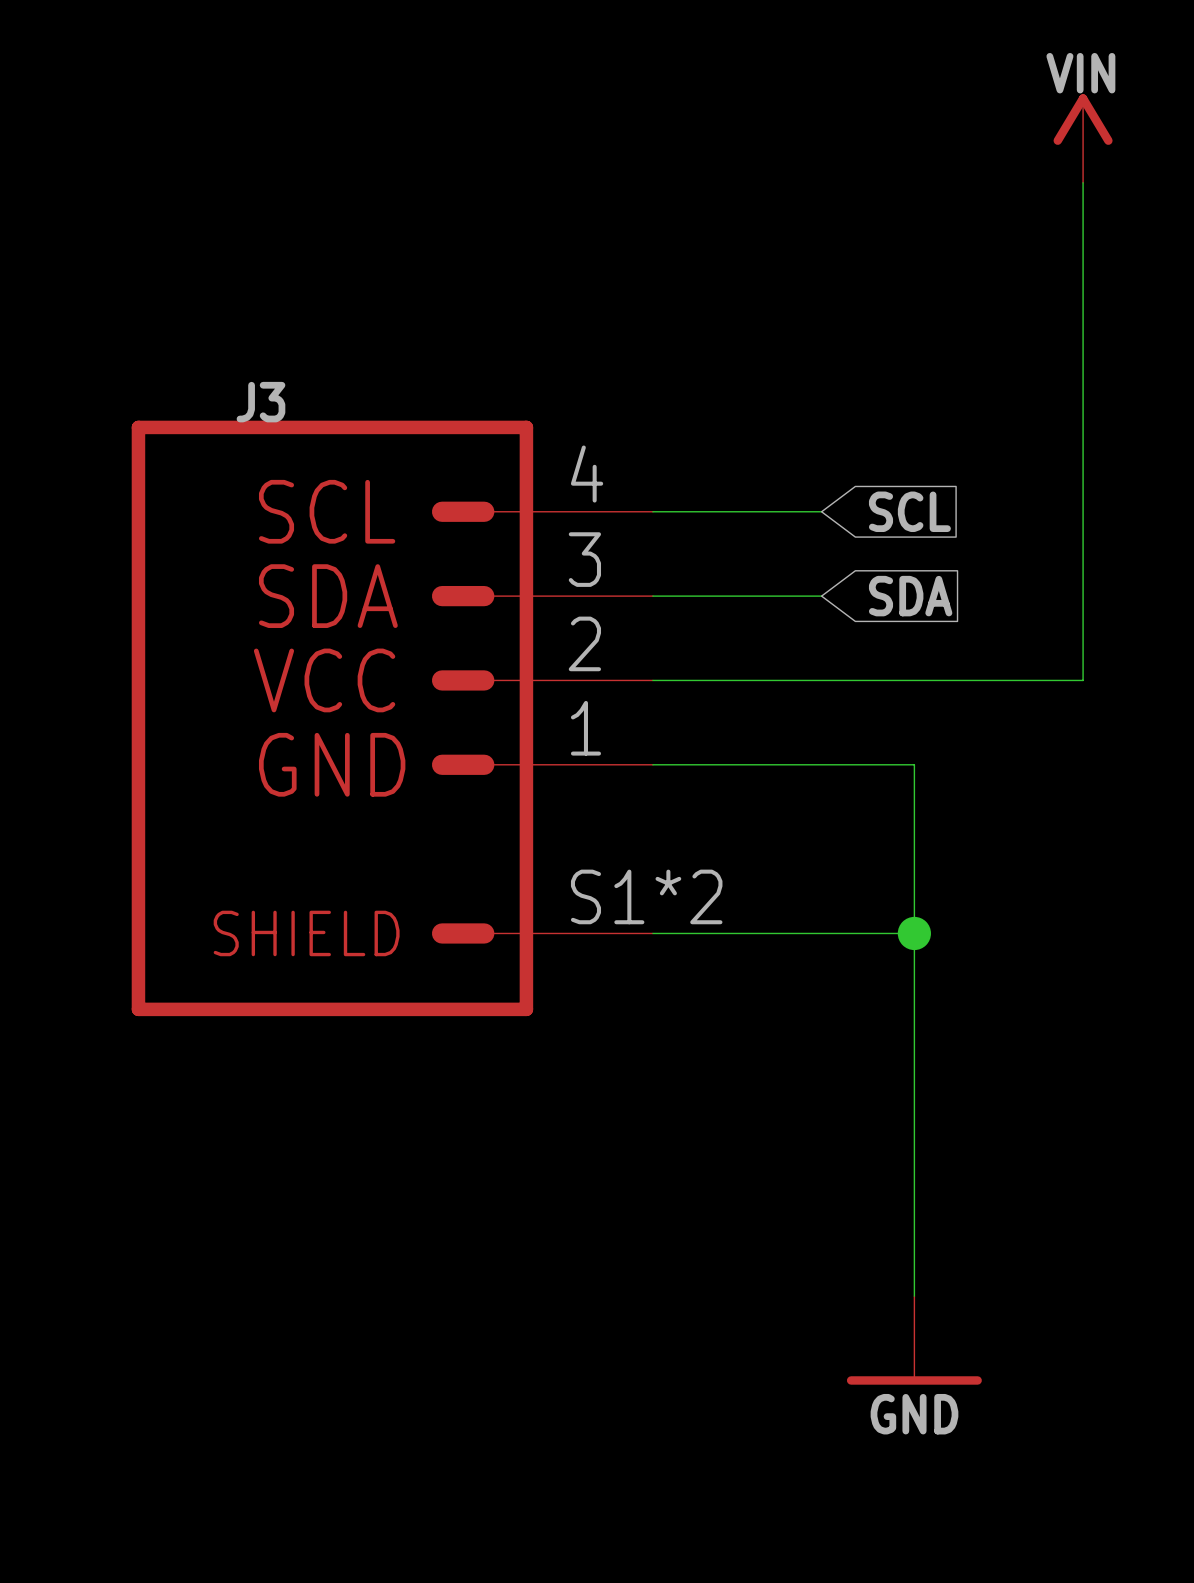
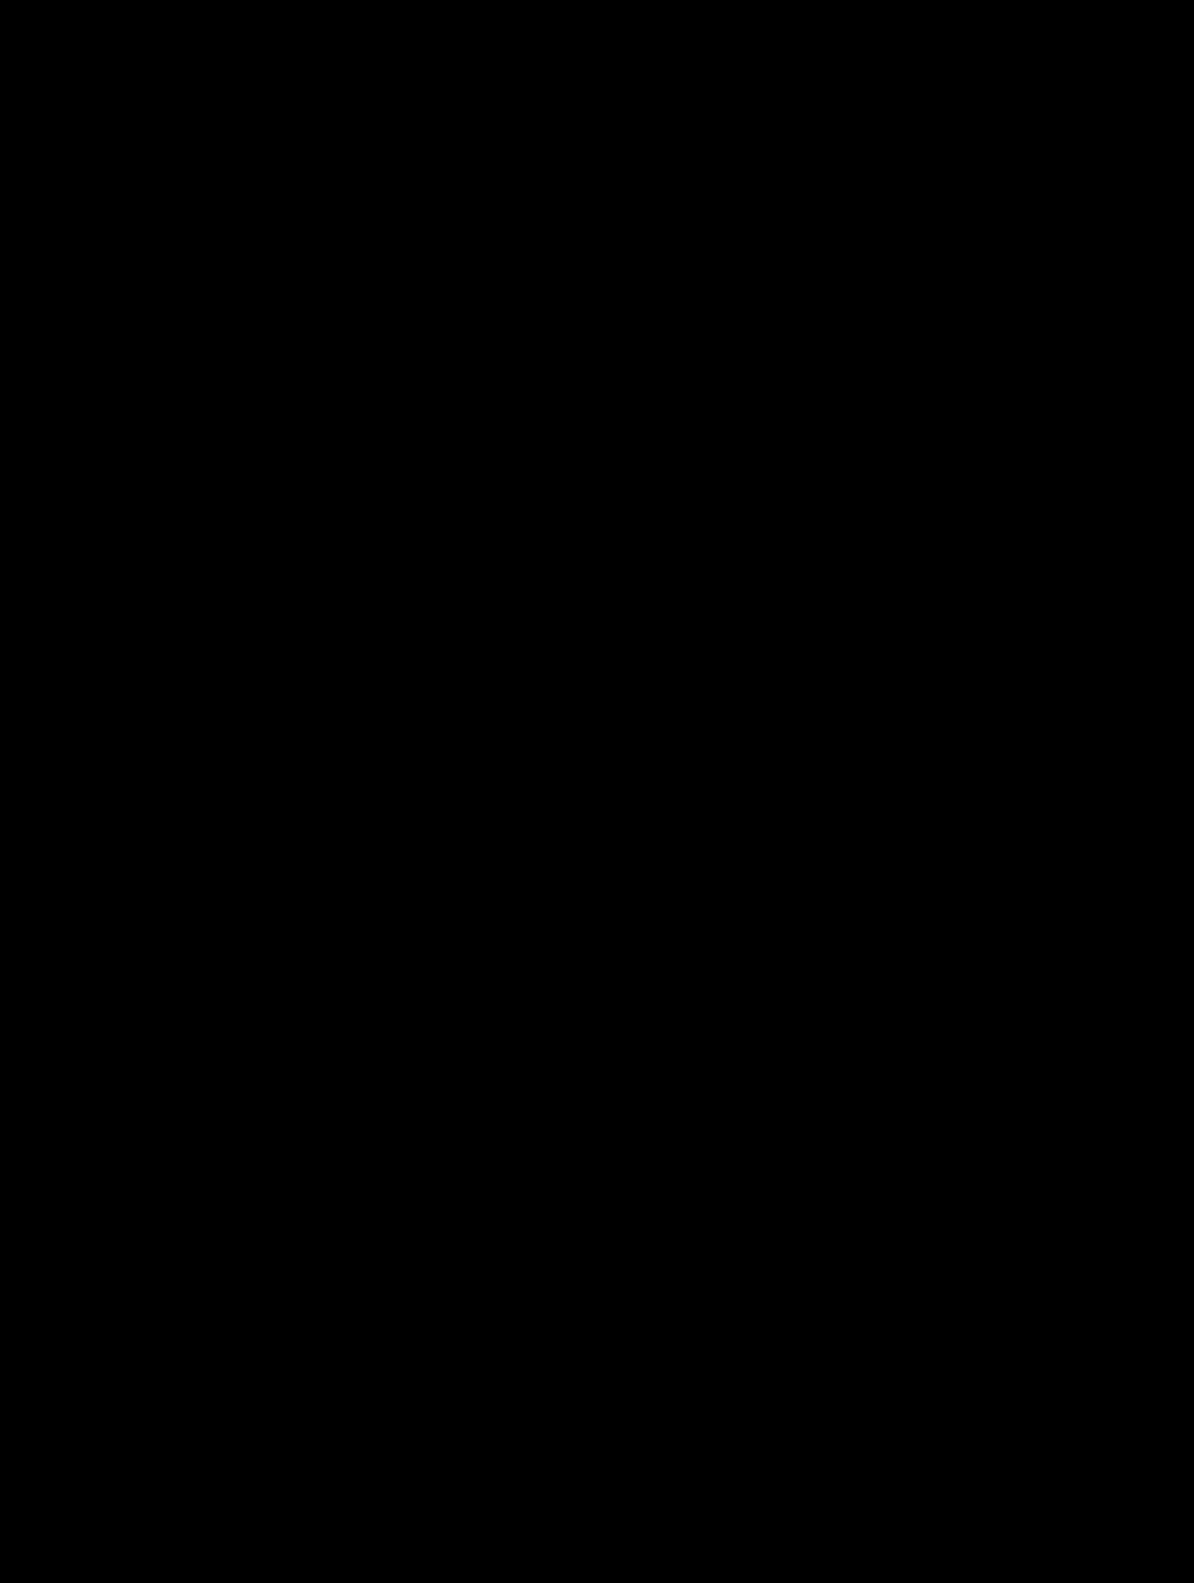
power symbol: VIN (1083, 138) -> none
wire: (1083, 182) (1083, 680) (652, 680) -> none
wire: (652, 511) (821, 511) -> none
global label: SCL (909, 511) -> none
wire: (652, 596) (821, 596) -> none
global label: SDA (910, 596) -> none
J3: (392, 718) -> none
wire: (652, 764) (914, 764) (914, 1296) -> none
wire: (652, 933) (914, 933) -> none
junction: (914, 933) -> none
power symbol: GND (914, 1340) -> none

